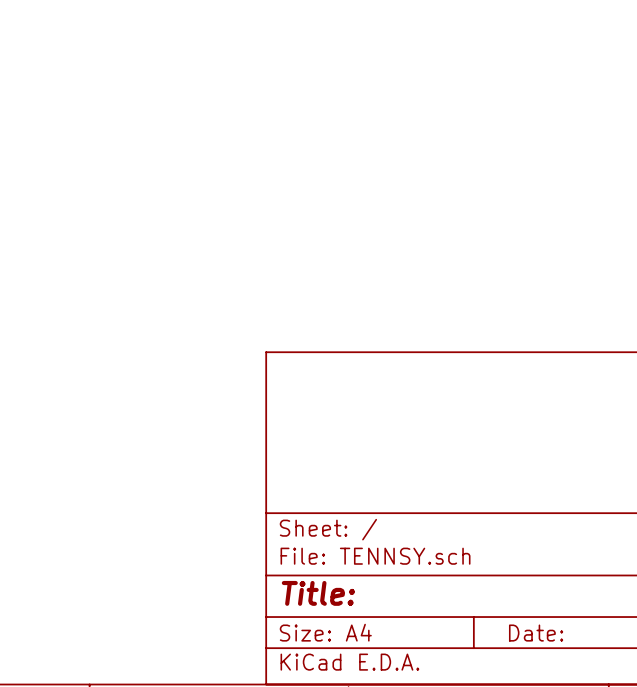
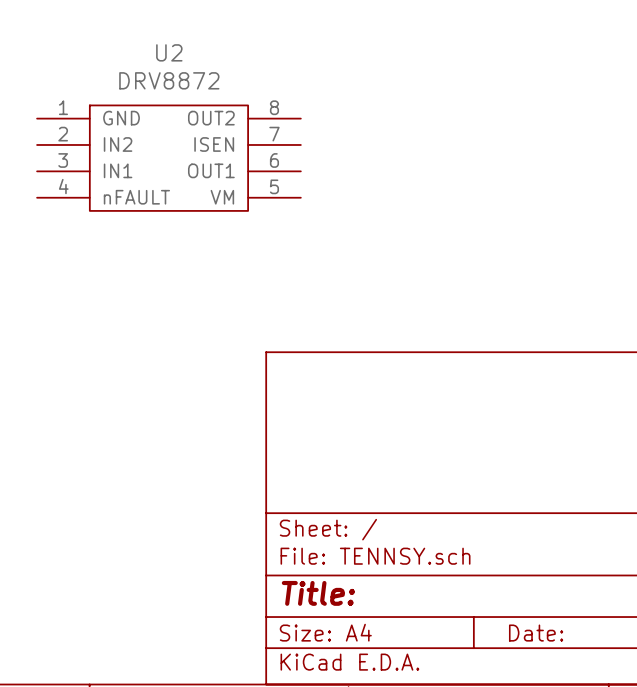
U2: none -> DRV8872 (168, 158)

